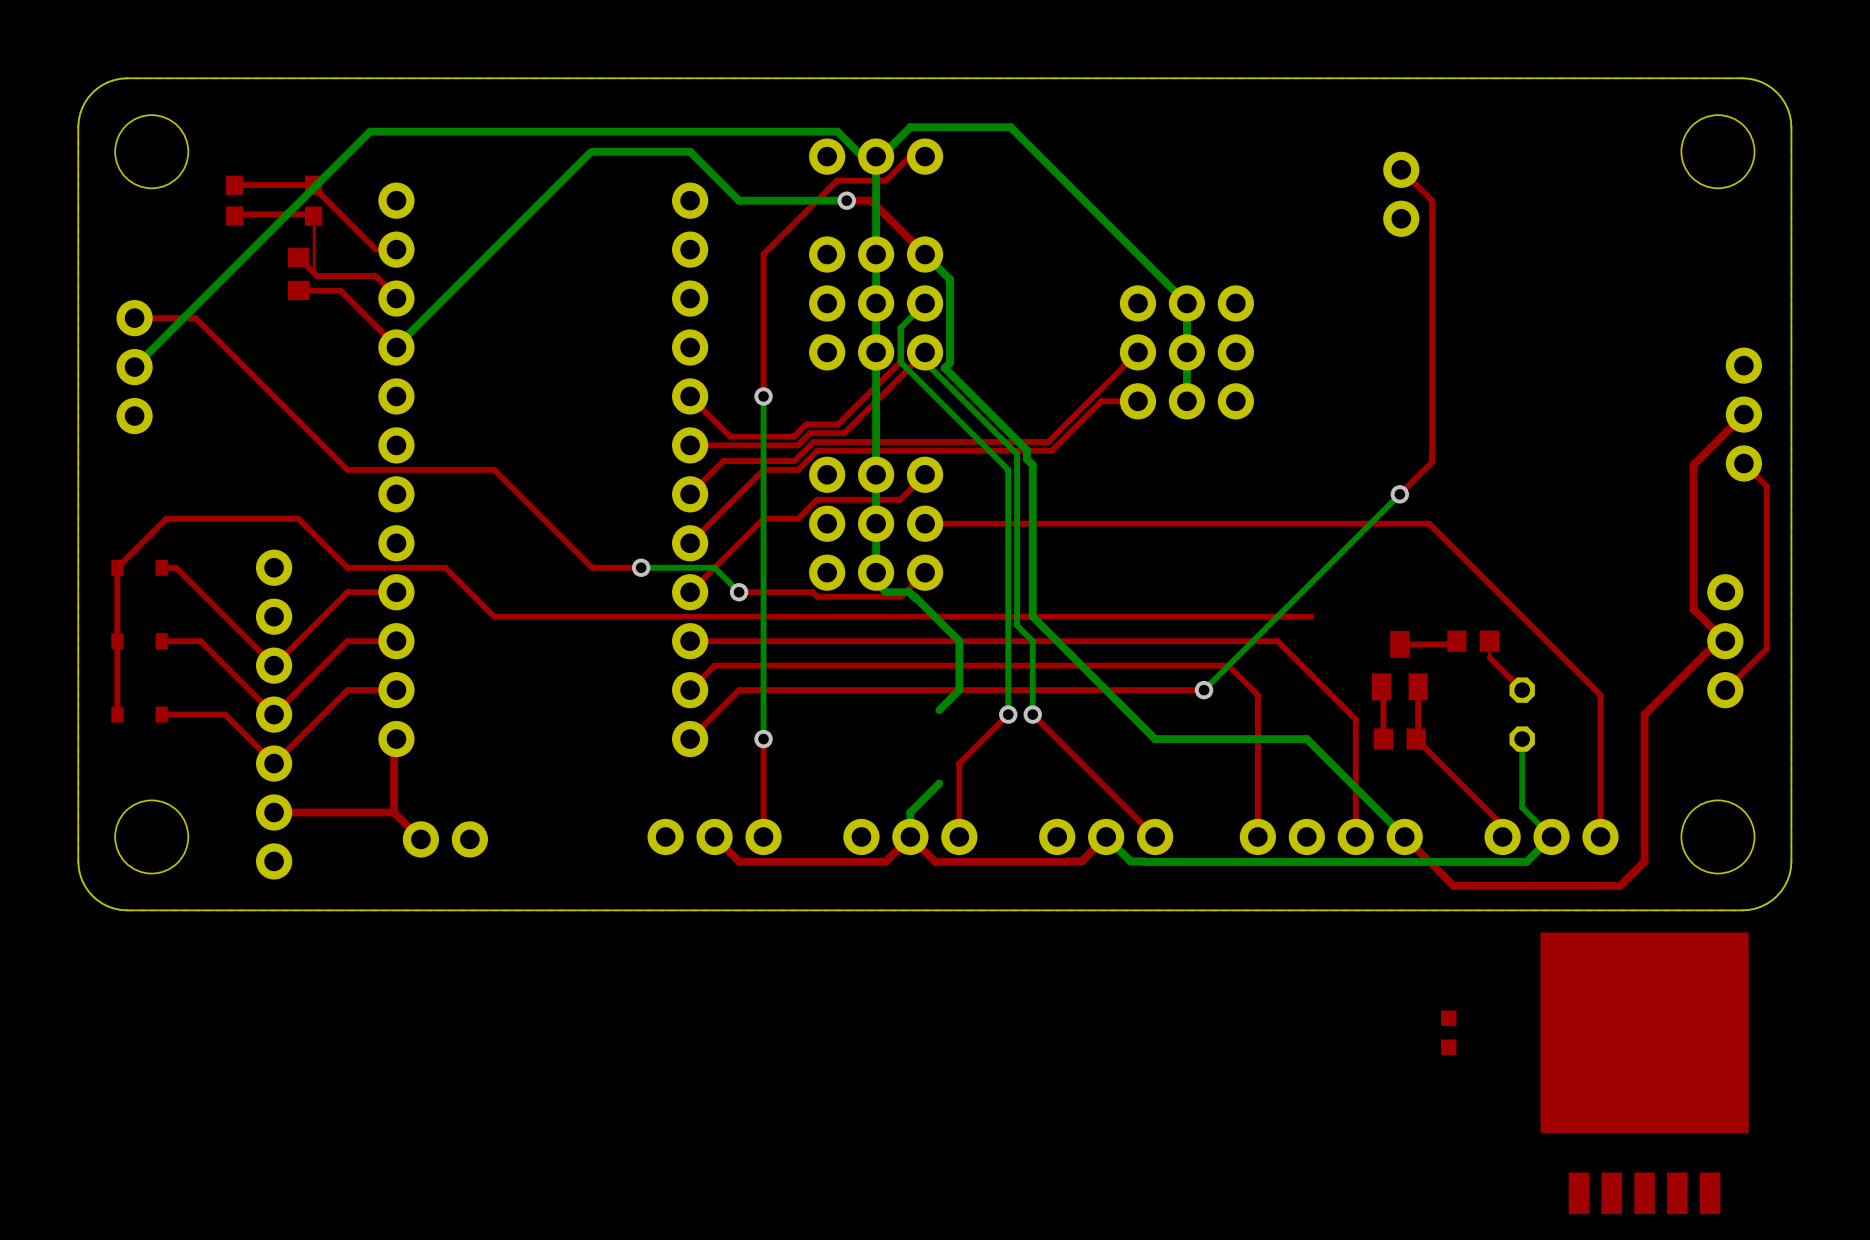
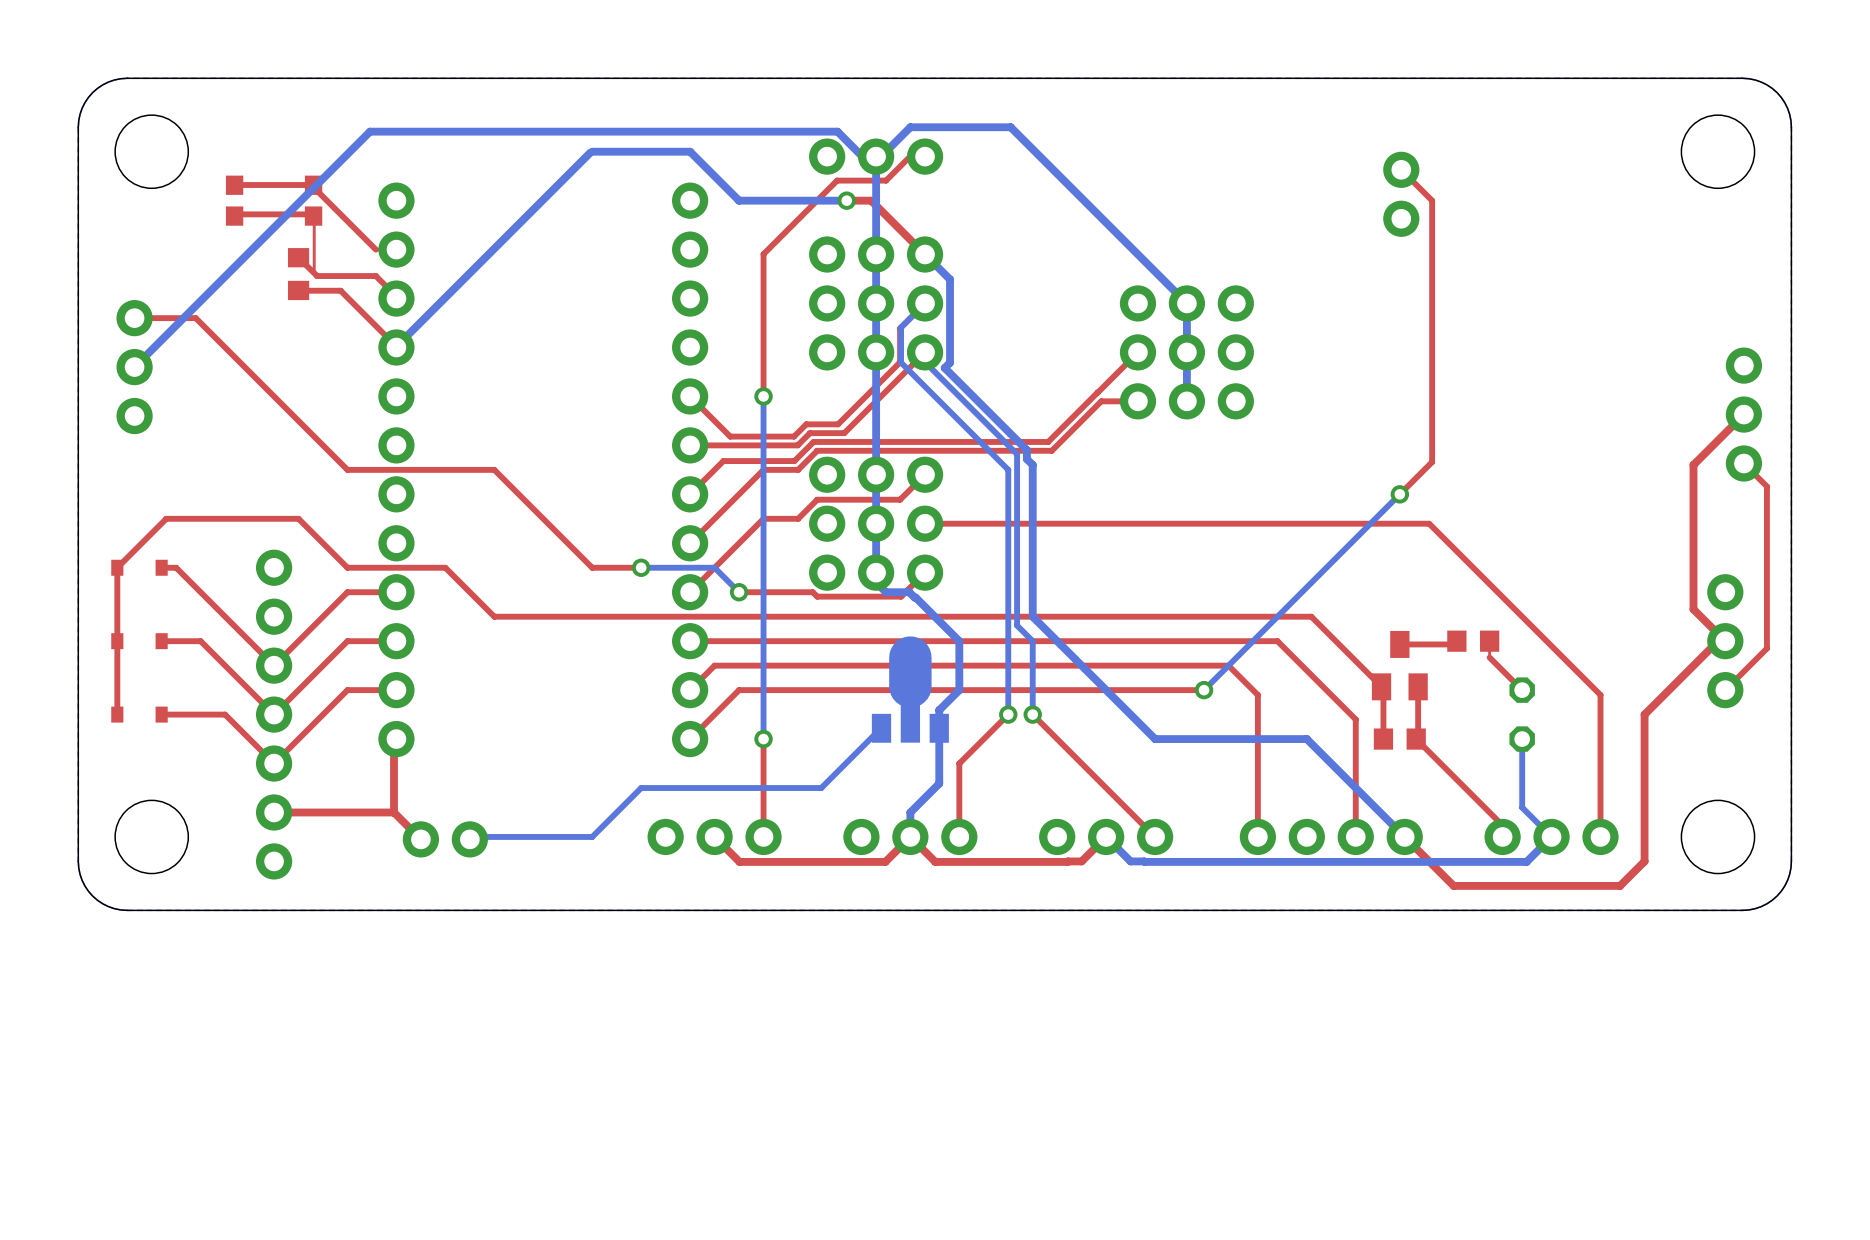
top track: none -> (1311, 616) (1381, 686)
part: none -> (910, 689)
bottom track: none -> (939, 710) (939, 783)
bottom track: none -> (881, 728) (821, 788) (641, 788) (592, 836) (469, 836) (469, 839)
part: (1448, 1032) -> none
part: (1644, 1073) -> none

